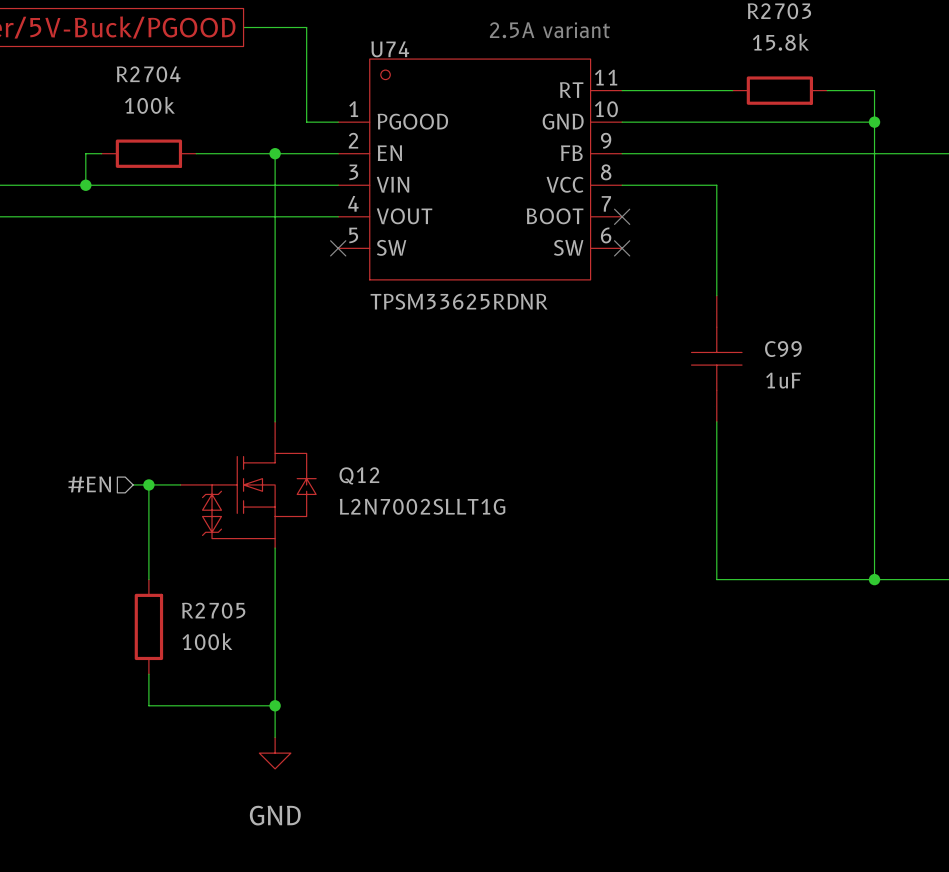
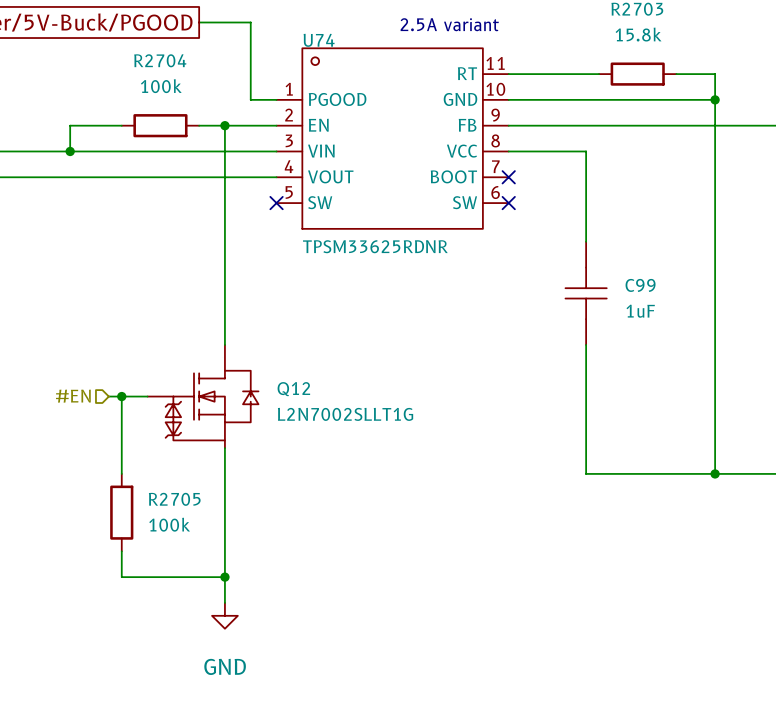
R2704 position: (148, 153) -> (160, 125)
wire: (196, 153) (243, 153) -> (83, 125) (121, 125)

